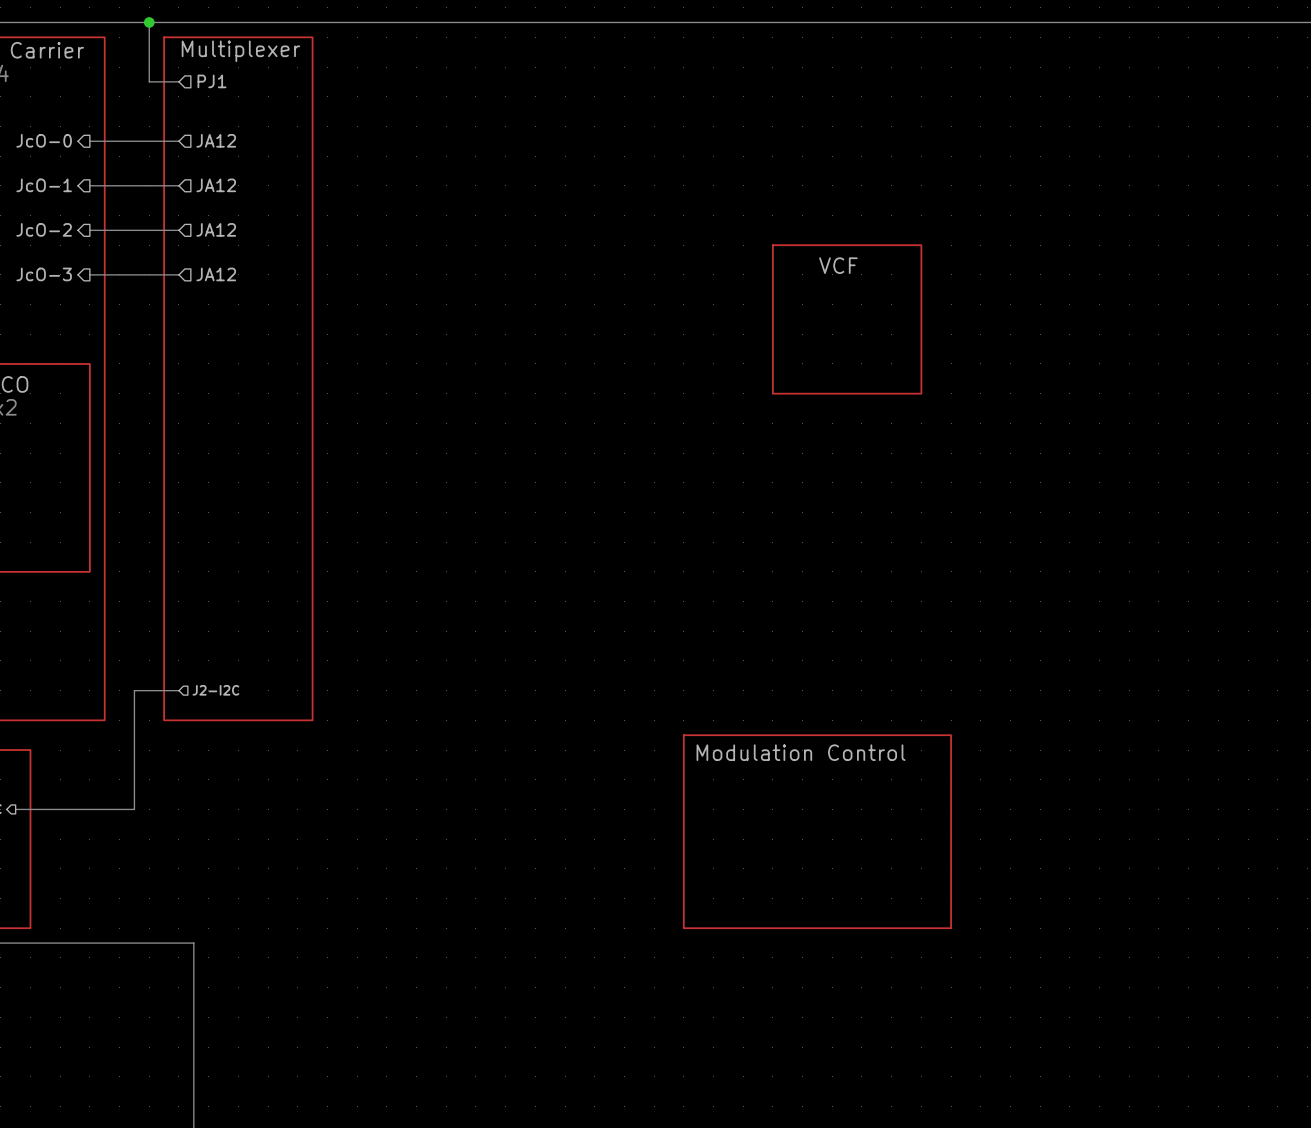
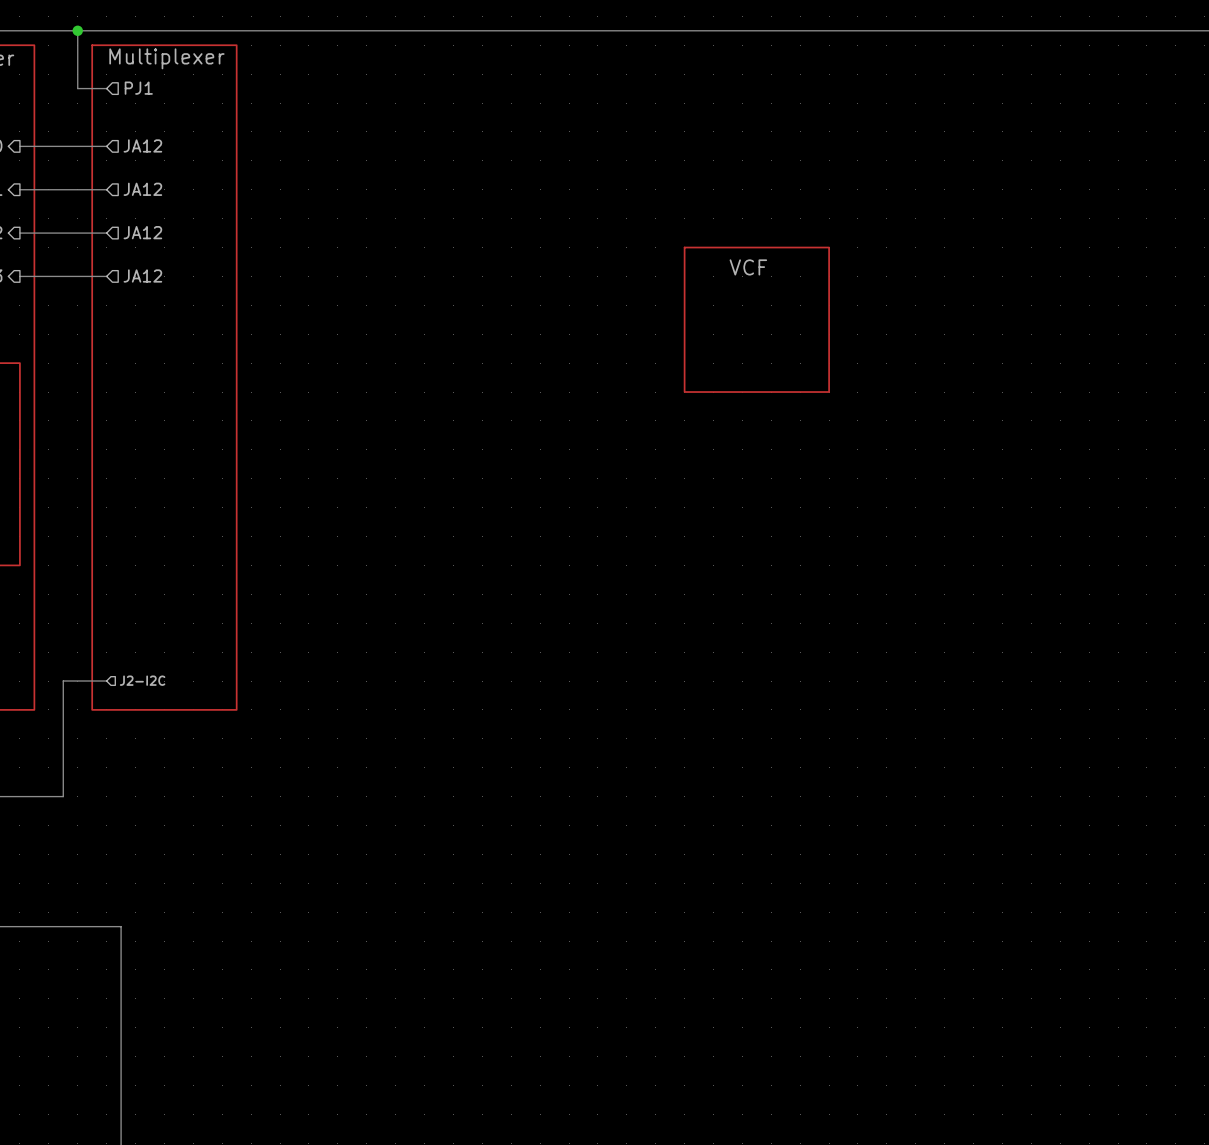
sheet Modulation Control: (817, 831) -> none

